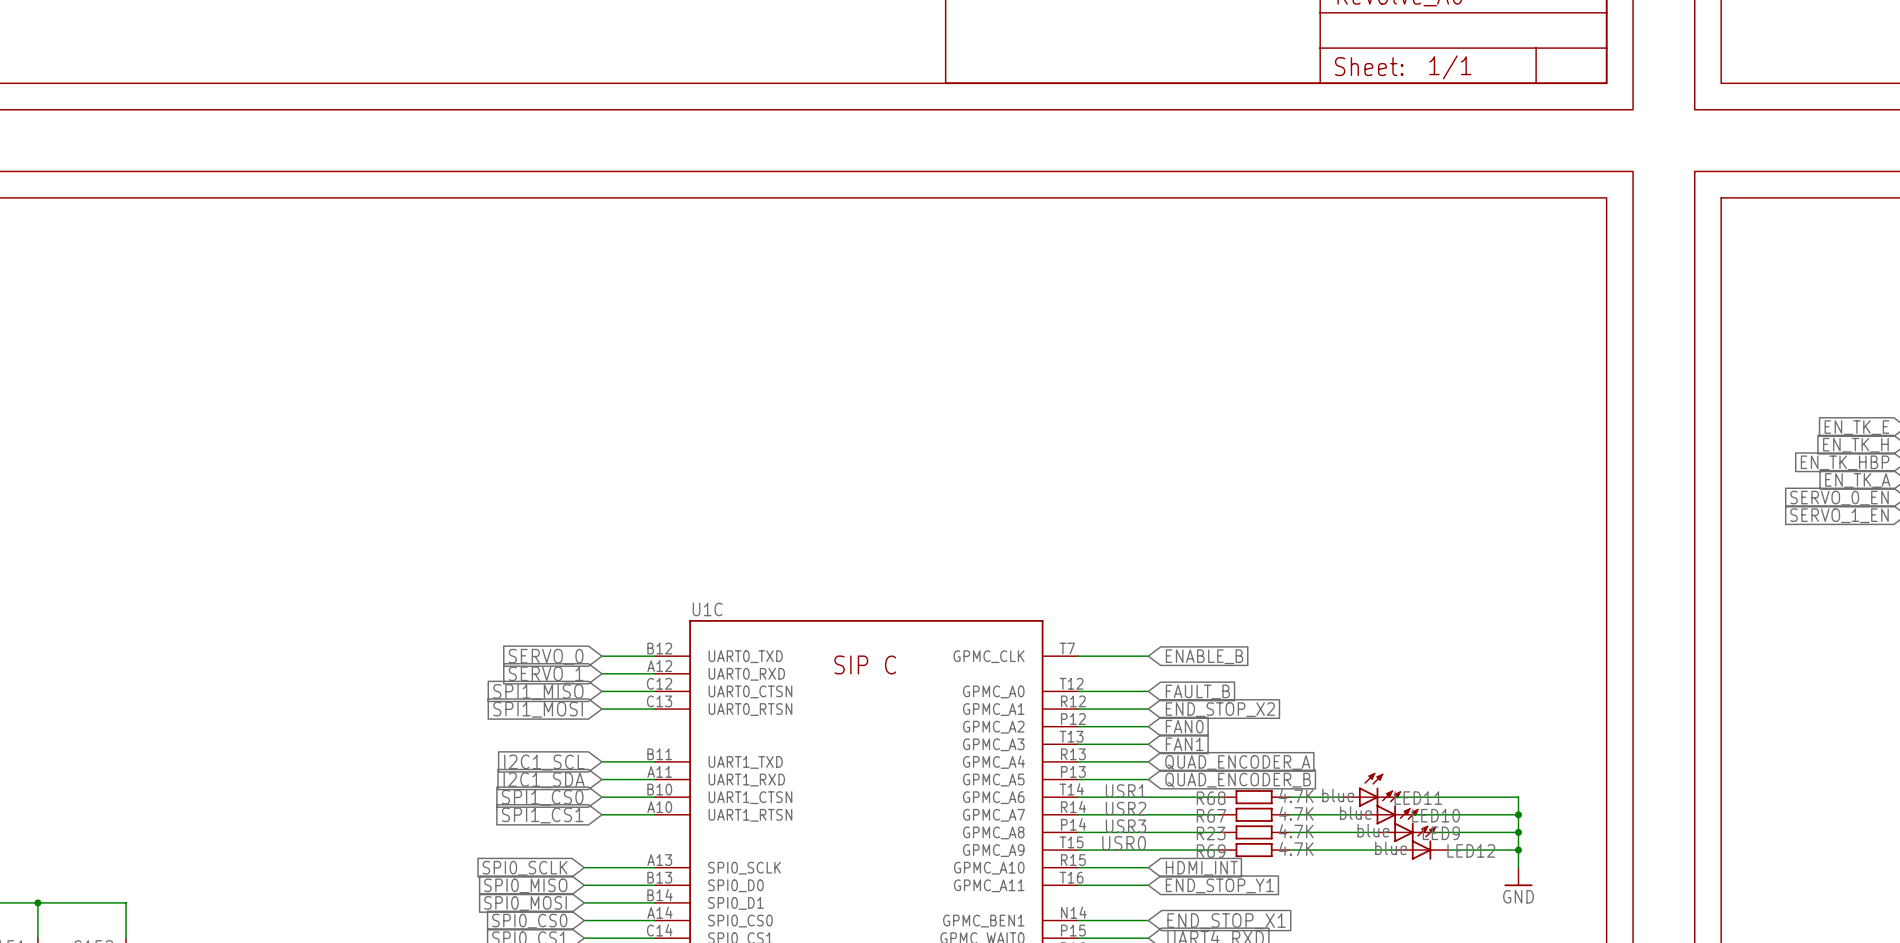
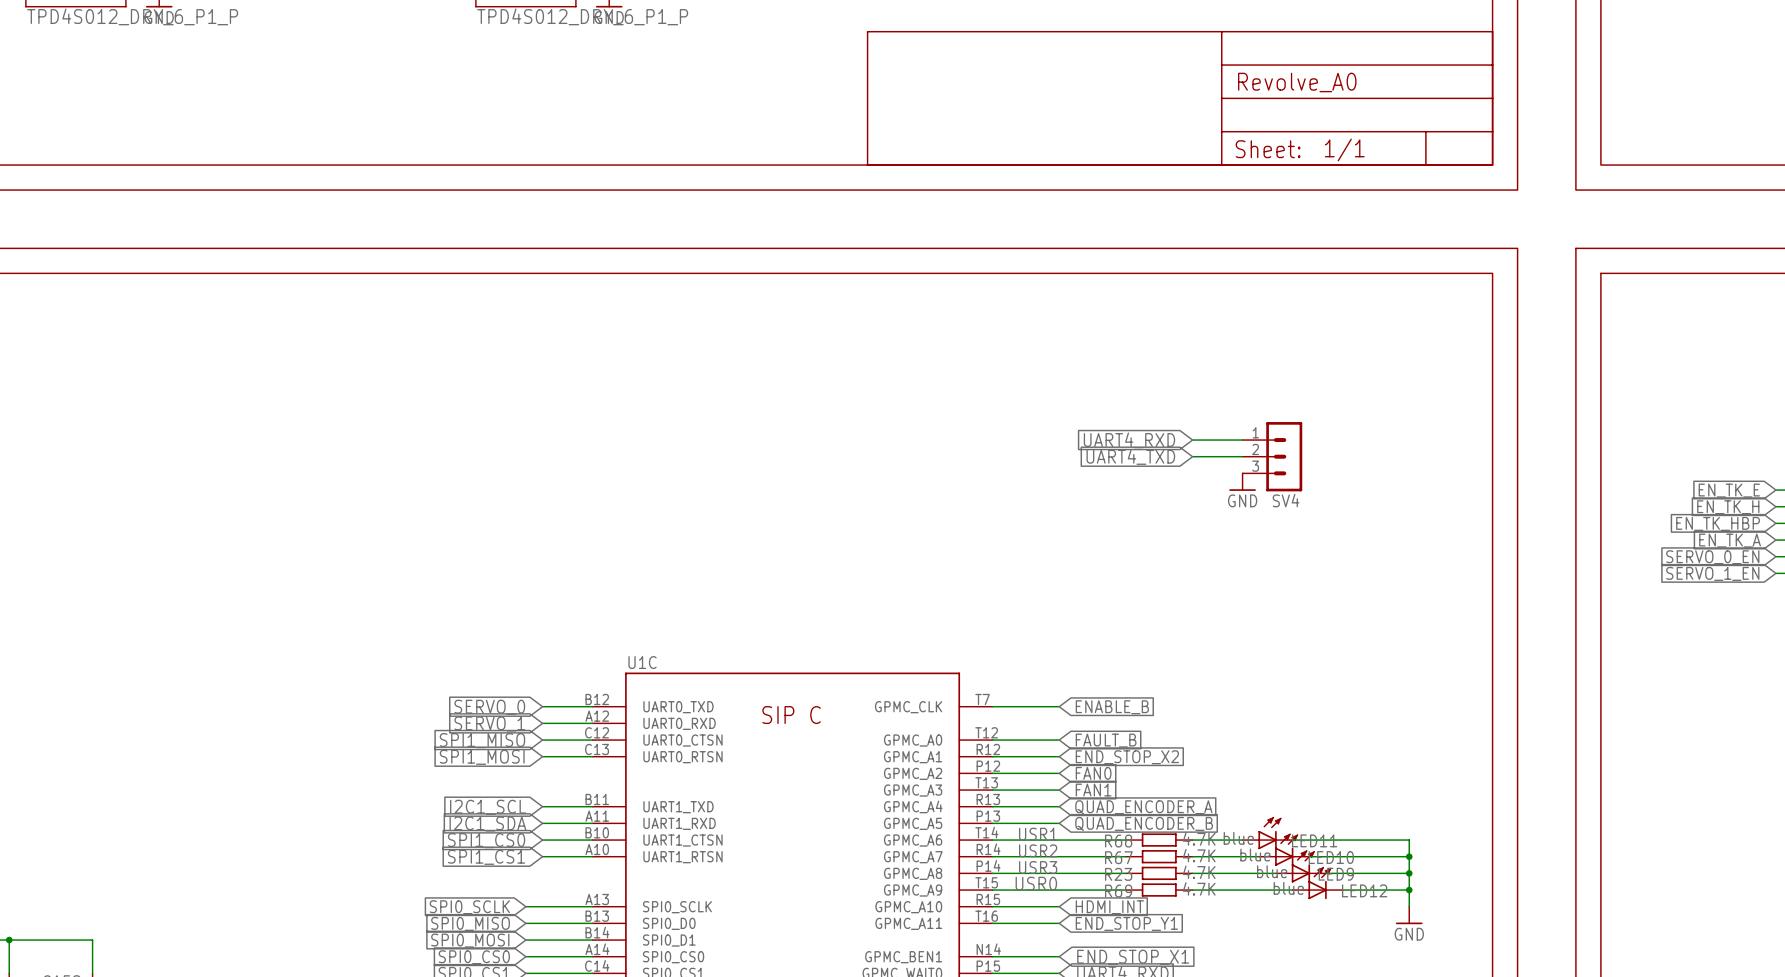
global label: none -> UART4_RXD (1129, 440)
wire: none -> (1192, 440) (1242, 440)
wire: none -> (1192, 456) (1242, 456)
SV4: none -> (1272, 456)
global label: none -> UART4_TXD (1130, 457)
power symbol: none -> GND (1242, 482)

